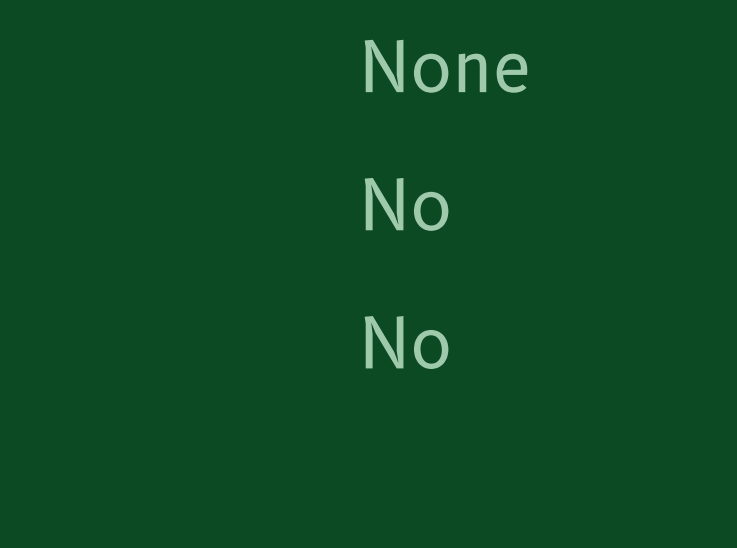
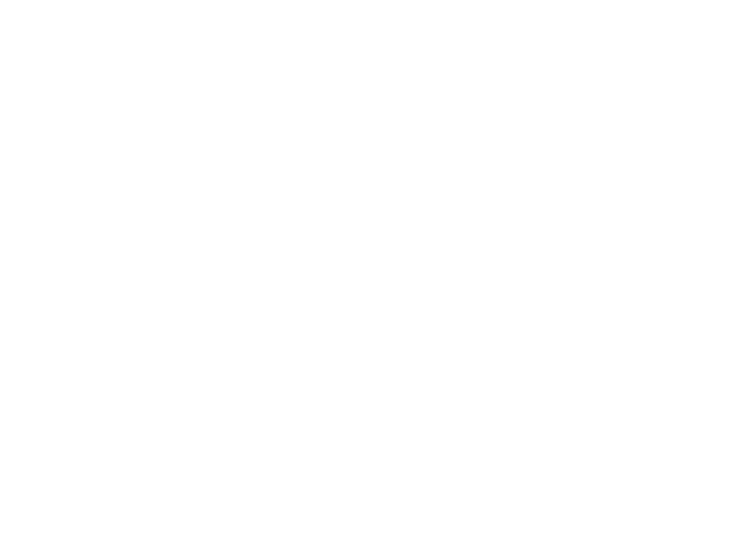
text: None (445, 66) -> none
text: No (406, 204) -> none
text: No (406, 342) -> none

